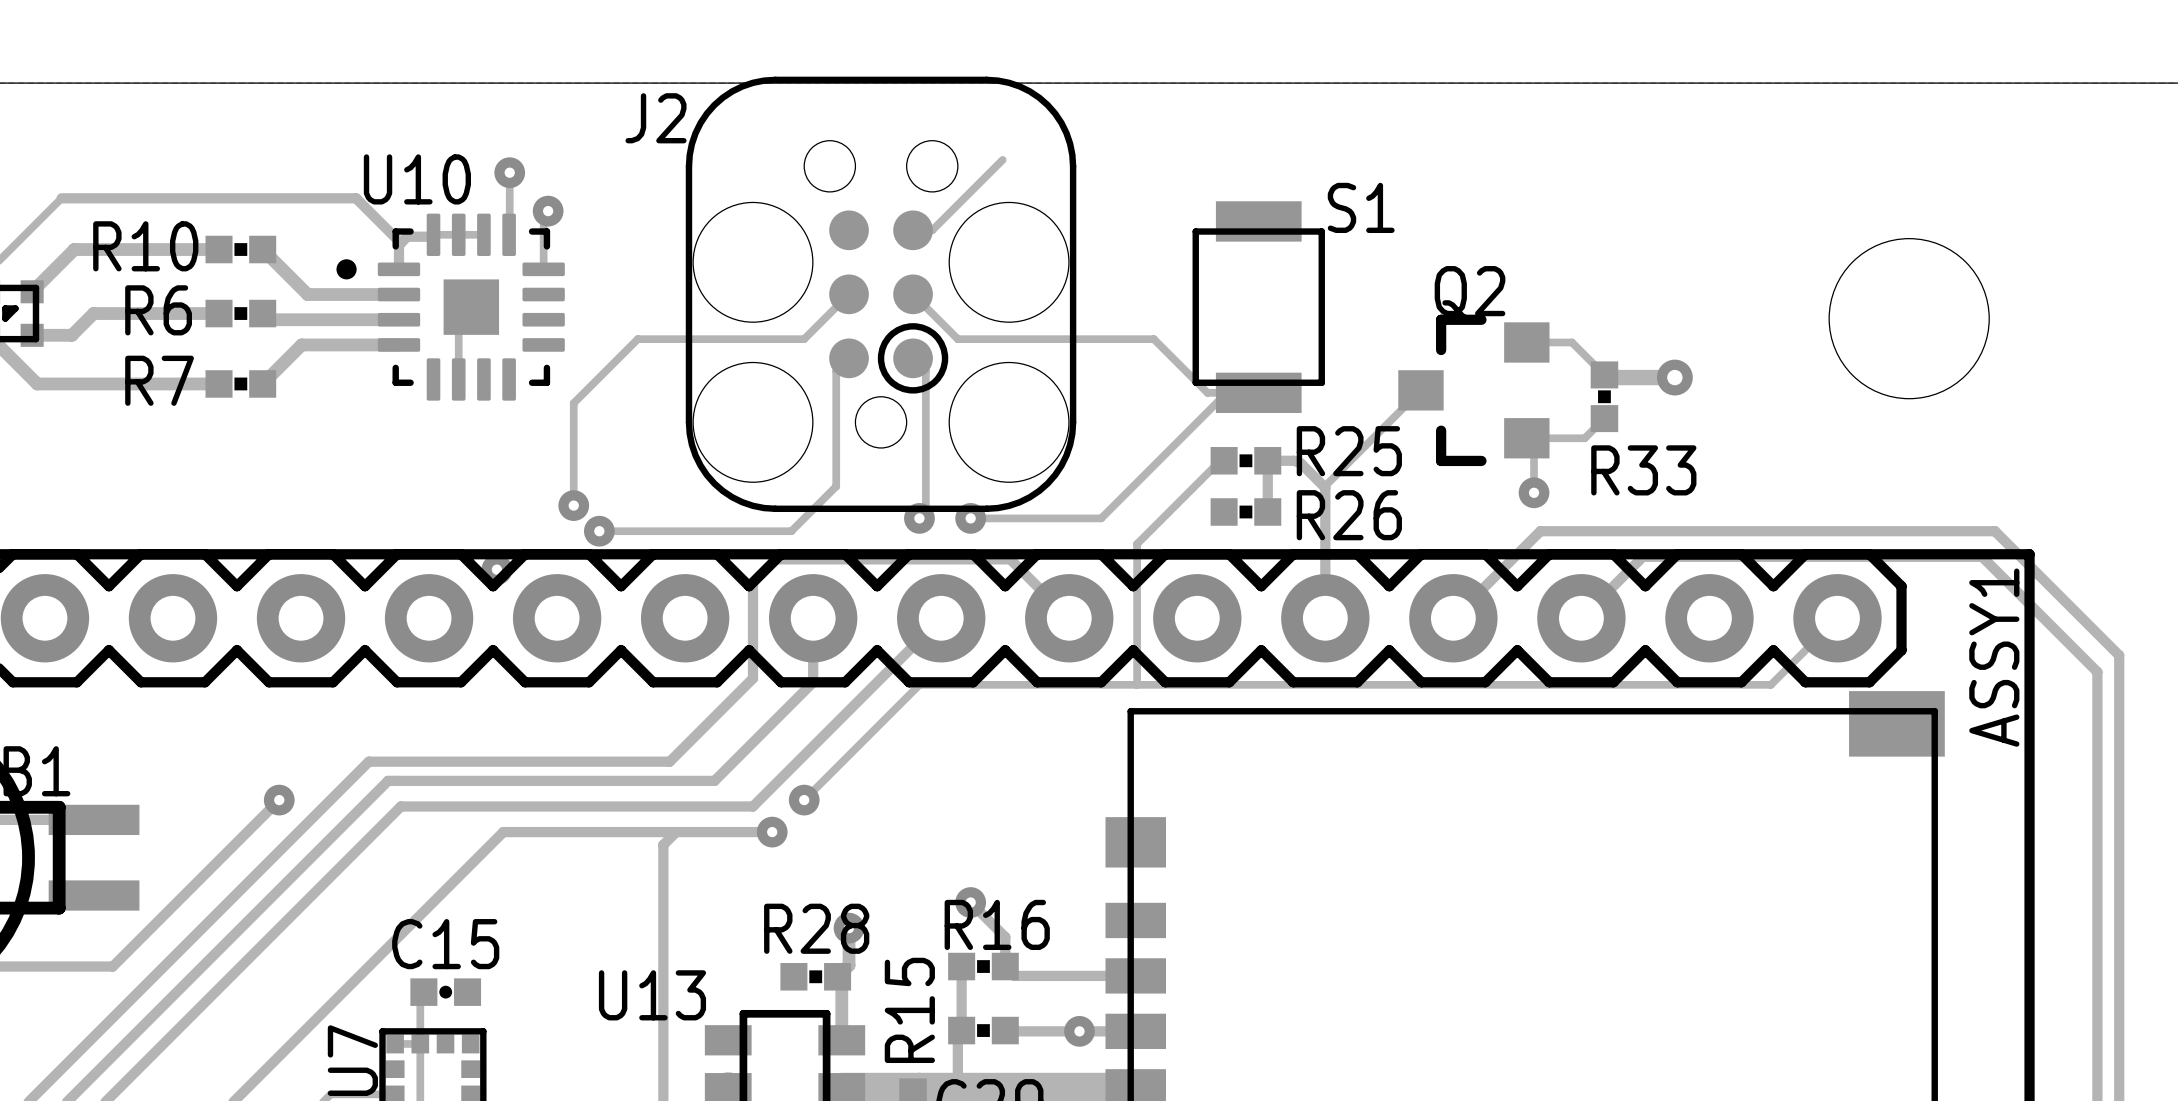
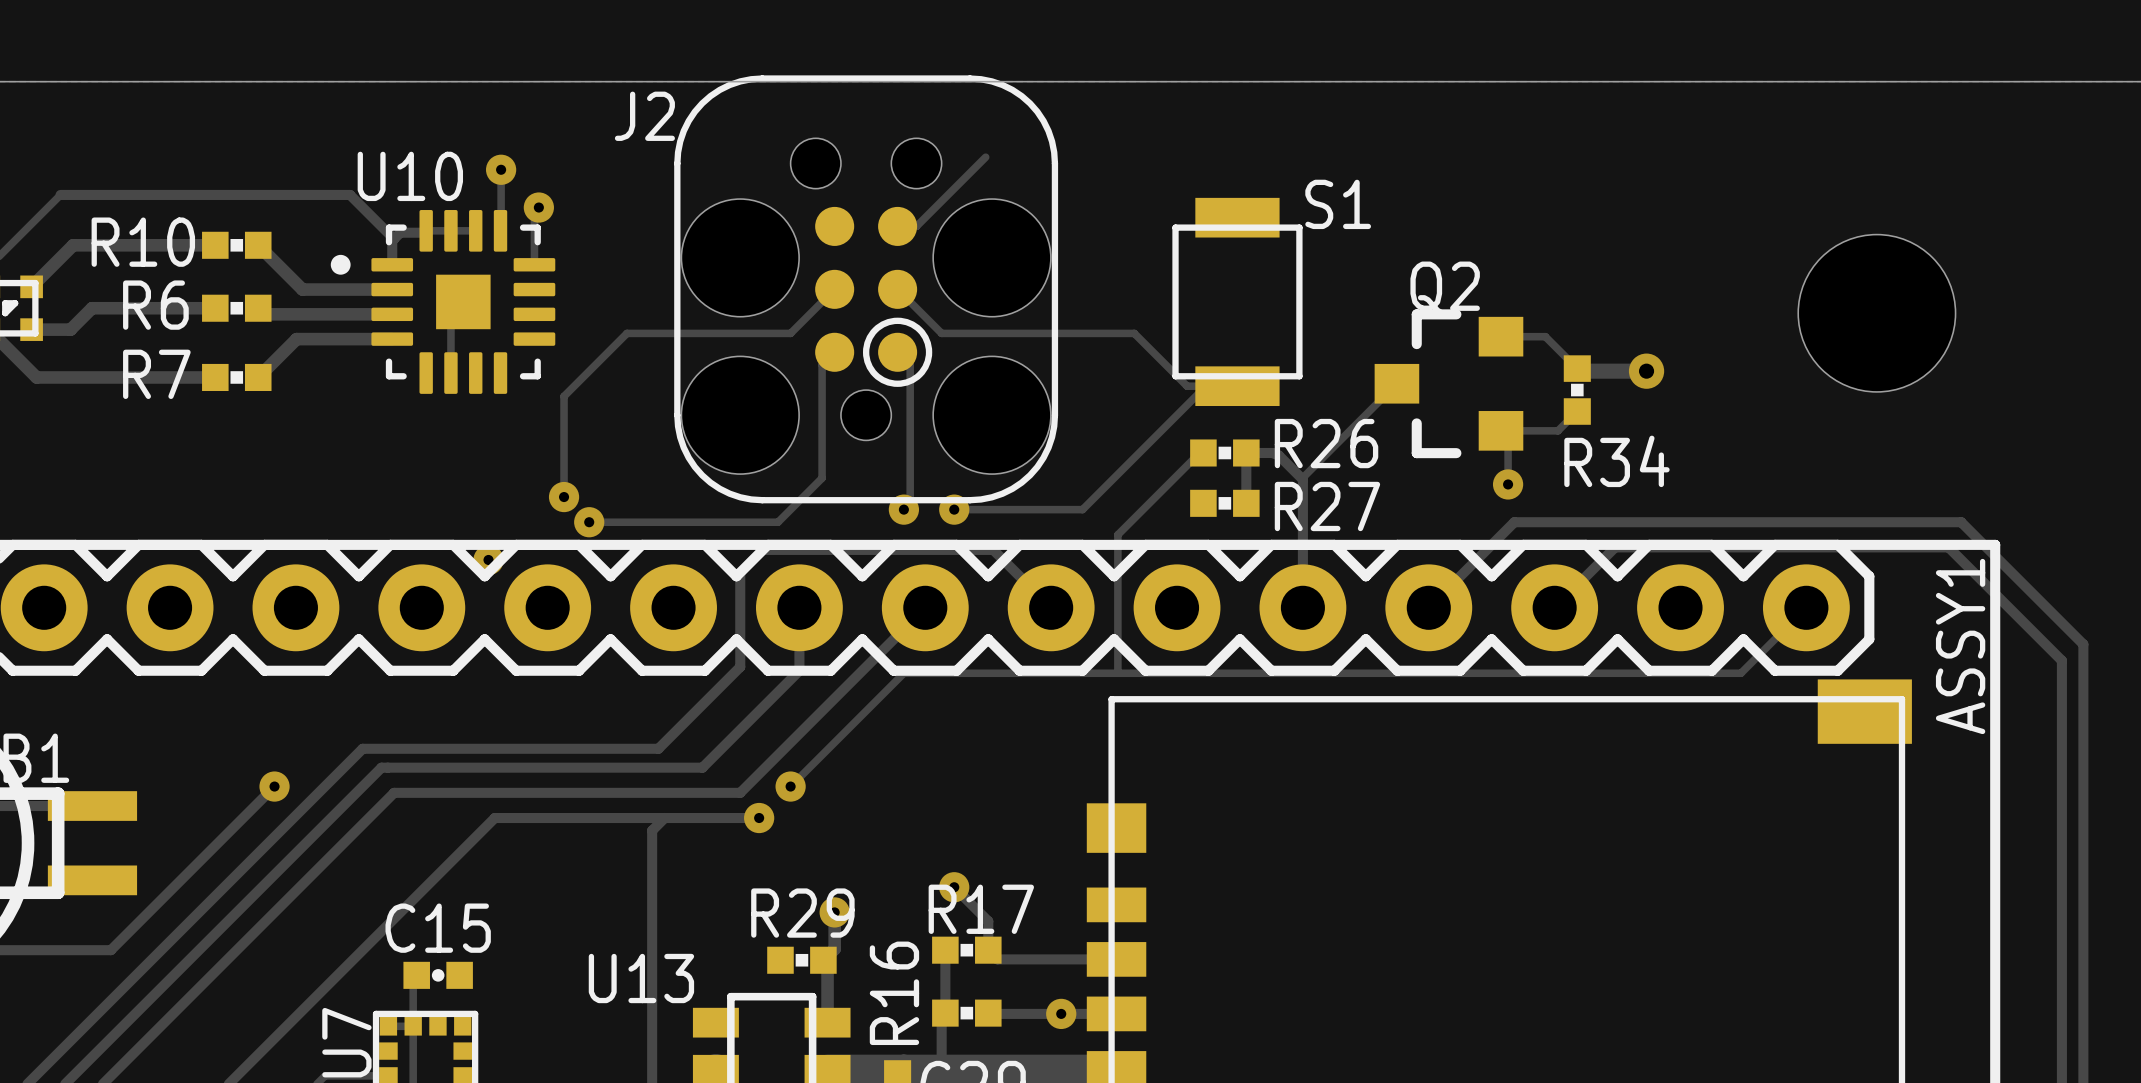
R25 name: R25 (1349, 451) -> R26 (1326, 443)
R33 name: R33 (1643, 470) -> R34 (1616, 461)
R26 name: R26 (1349, 515) -> R27 (1327, 506)
R16 name: R16 (997, 924) -> R17 (981, 909)
R28 name: R28 (816, 928) -> R29 (802, 913)
R15 name: R15 (909, 1010) -> R16 (894, 993)

